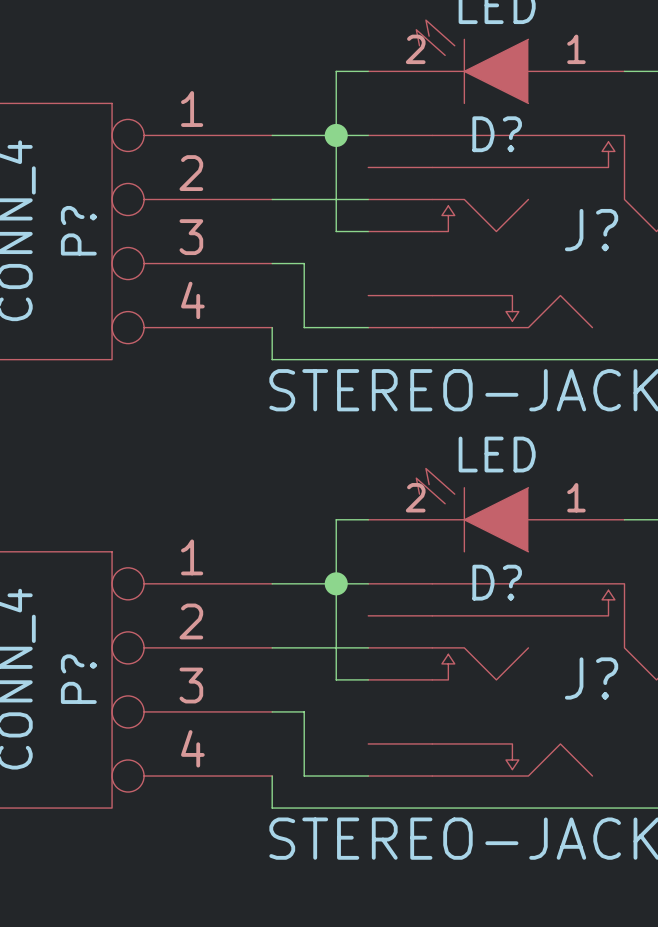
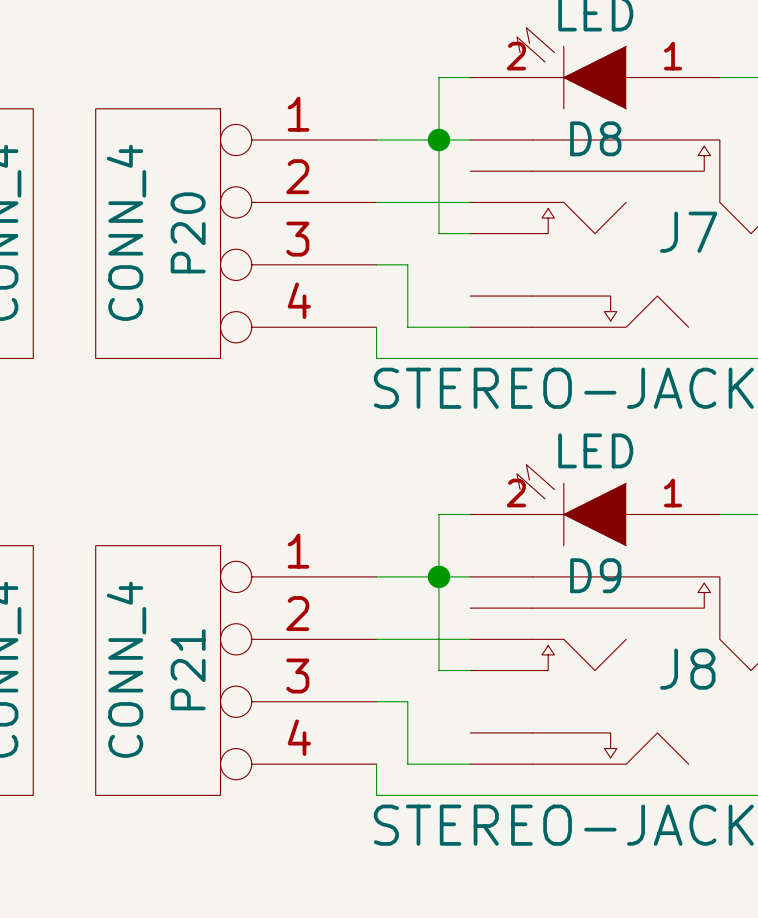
D? name: D? (497, 134) -> D8 (595, 138)
P? name: P? (78, 230) -> P20 (188, 232)
J? name: J? (591, 230) -> J7 (688, 232)
D? name: D? (497, 582) -> D9 (595, 575)
J? name: J? (591, 678) -> J8 (687, 669)
P? name: P? (78, 679) -> P21 (188, 669)

